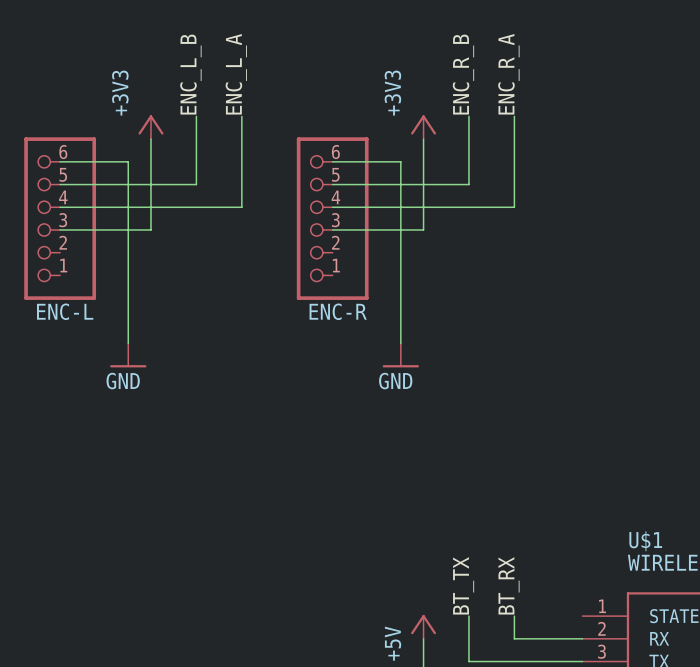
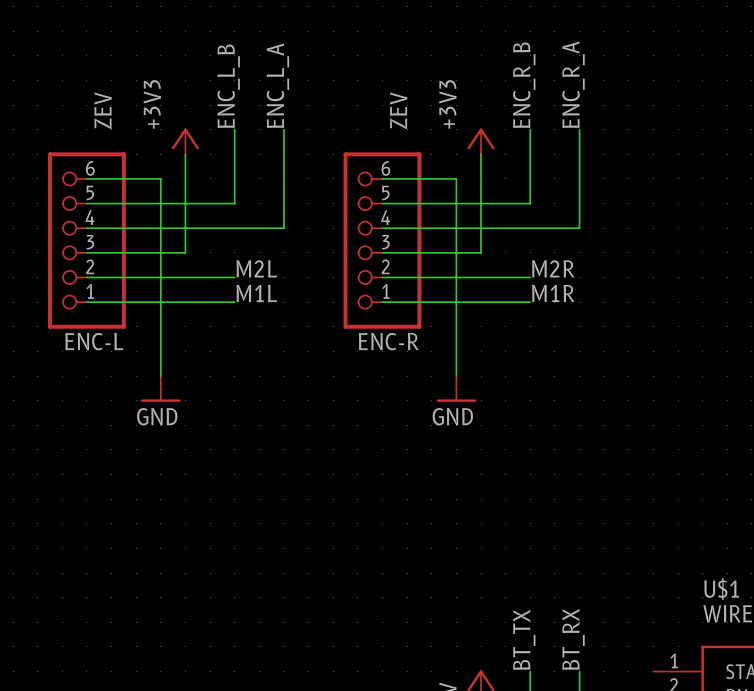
label: none -> ZEV (103, 110)
label: none -> ZEV (398, 110)
label: none -> M2L (256, 268)
label: none -> M2R (553, 268)
wire: none -> (86, 277) (234, 277)
wire: none -> (382, 277) (530, 277)
label: none -> M1L (256, 293)
label: none -> M1R (553, 293)
wire: none -> (86, 302) (234, 302)
wire: none -> (382, 302) (530, 302)

